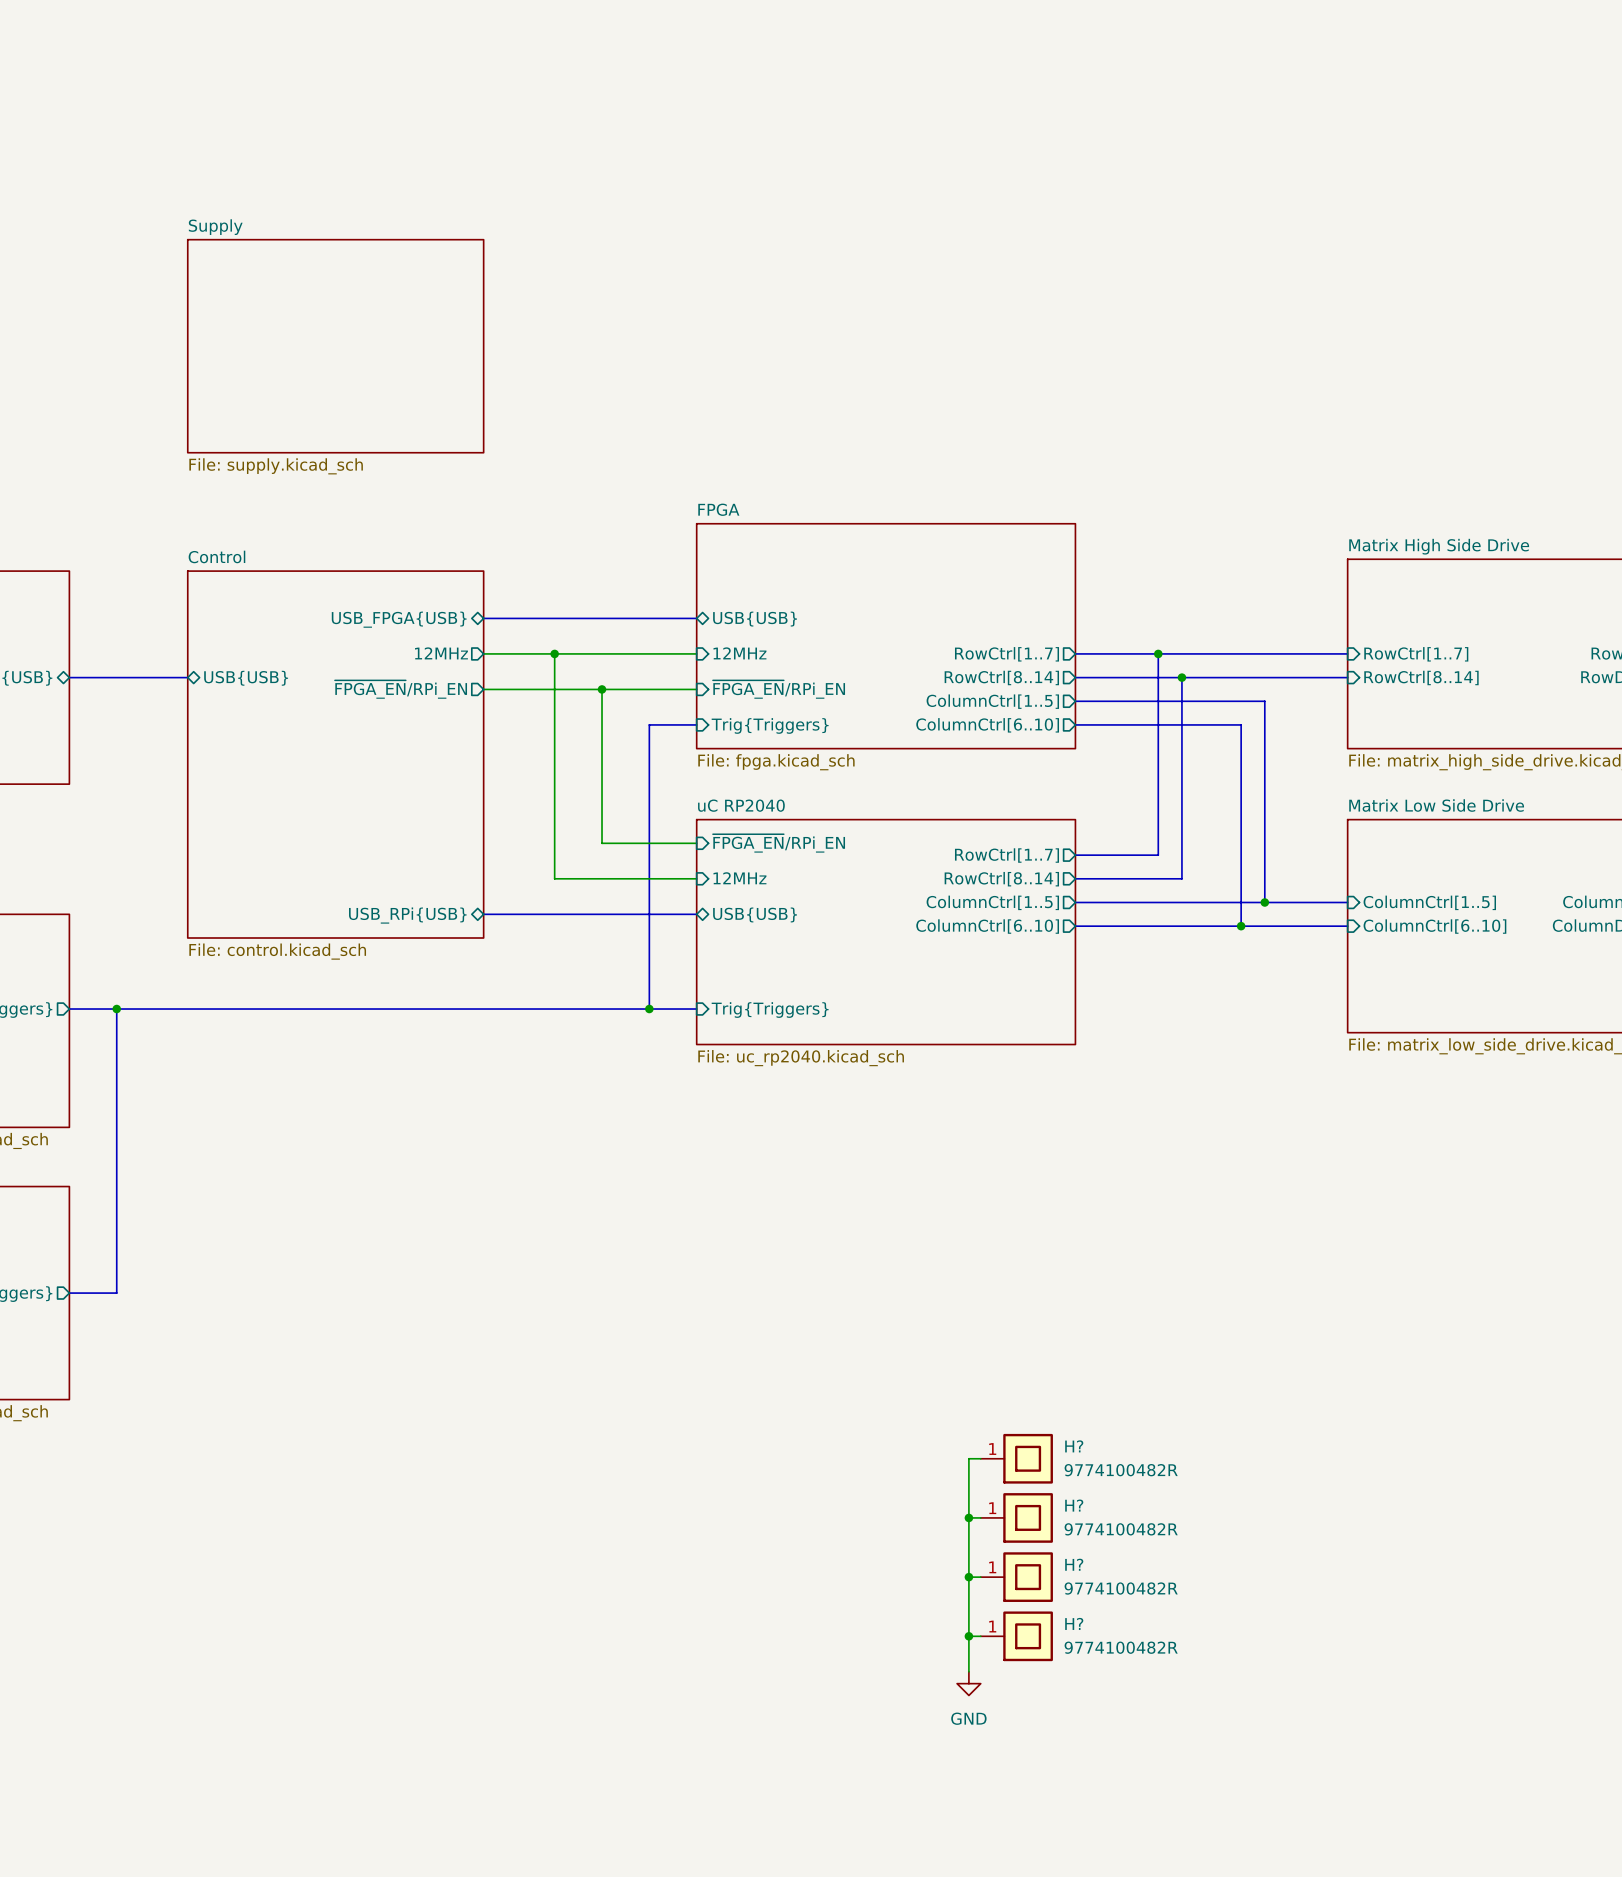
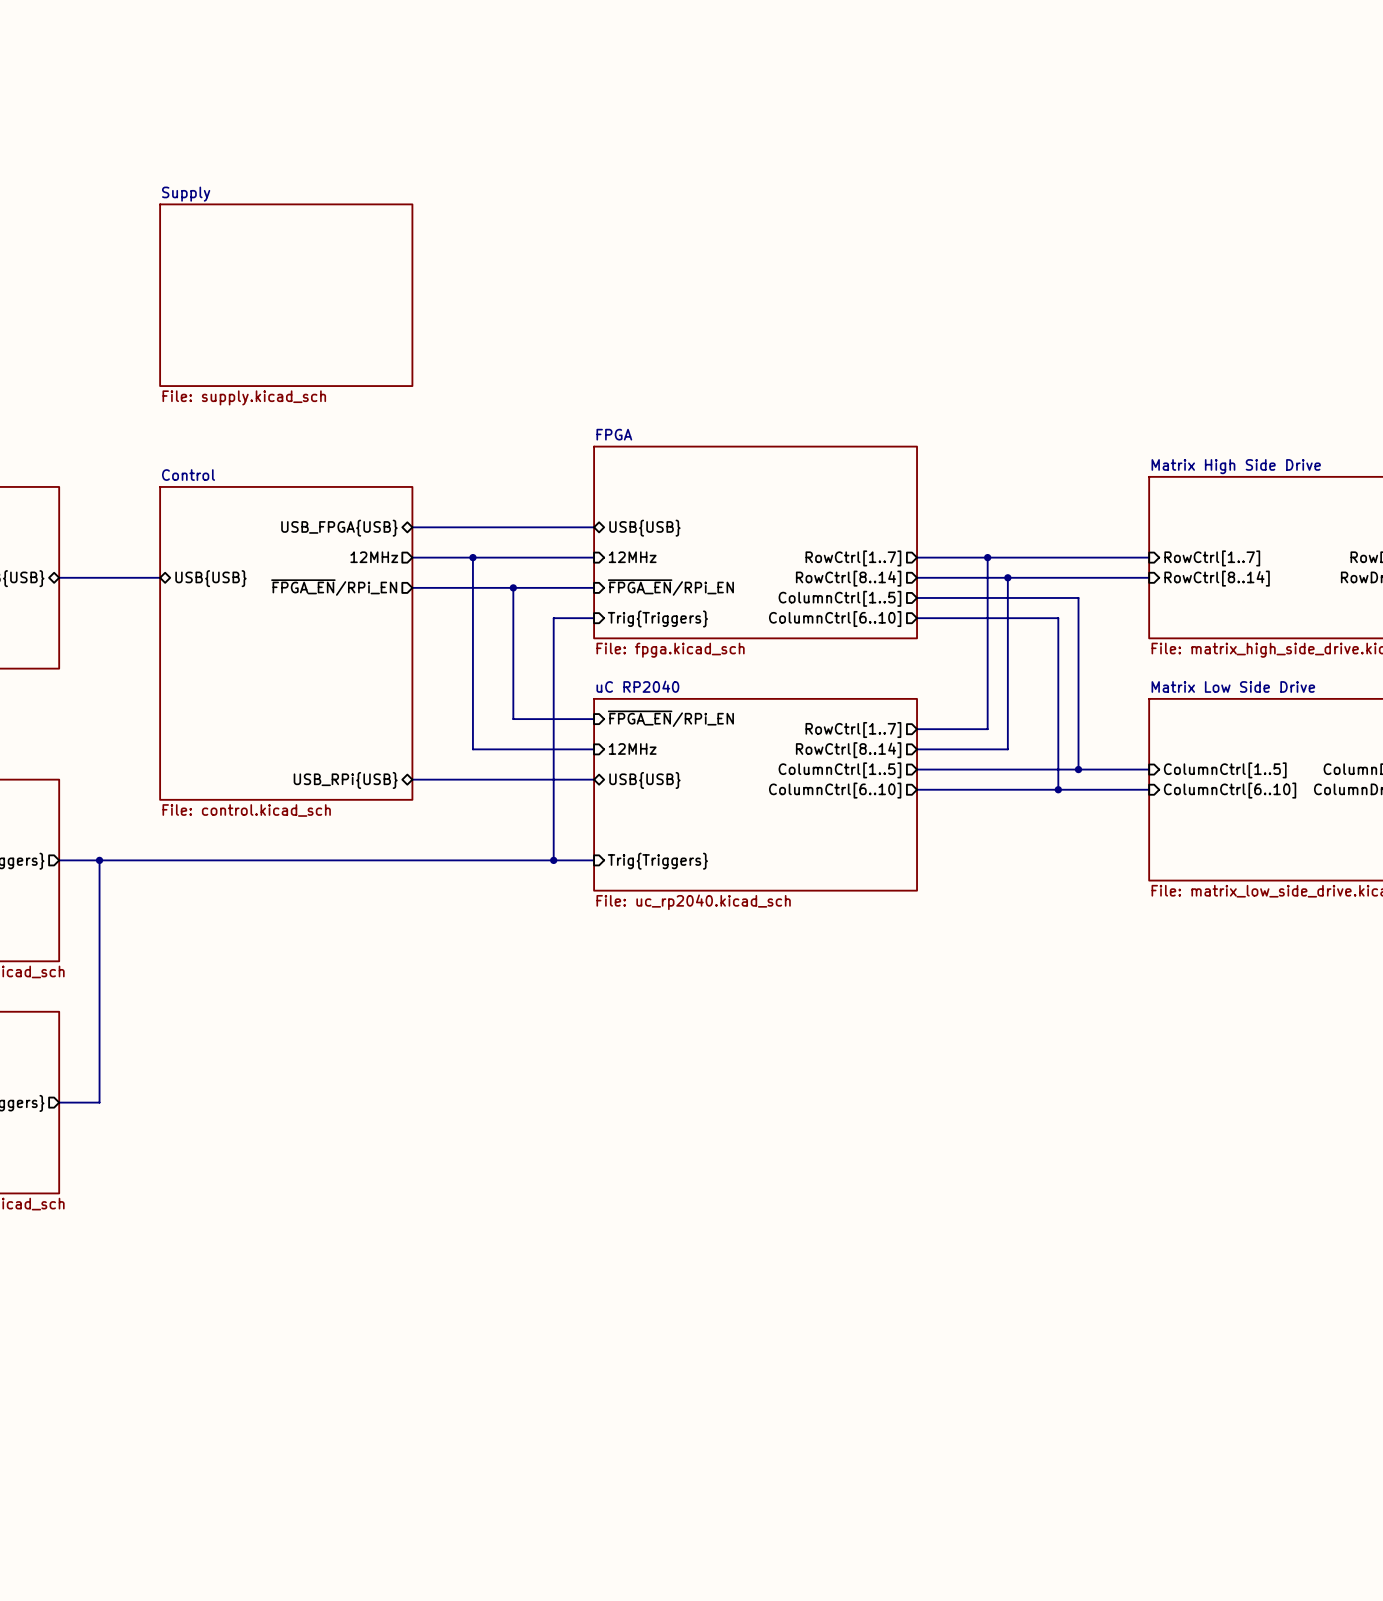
wire: (980, 1458) (968, 1458) (968, 1671) -> none
H?: (1016, 1458) -> none
wire: (968, 1517) (980, 1517) -> none
junction: (968, 1517) -> none
H?: (1016, 1517) -> none
wire: (968, 1577) (980, 1577) -> none
junction: (968, 1577) -> none
H?: (1016, 1577) -> none
wire: (968, 1636) (980, 1636) -> none
junction: (968, 1636) -> none
H?: (1016, 1636) -> none
power symbol: GND (968, 1683) -> none

